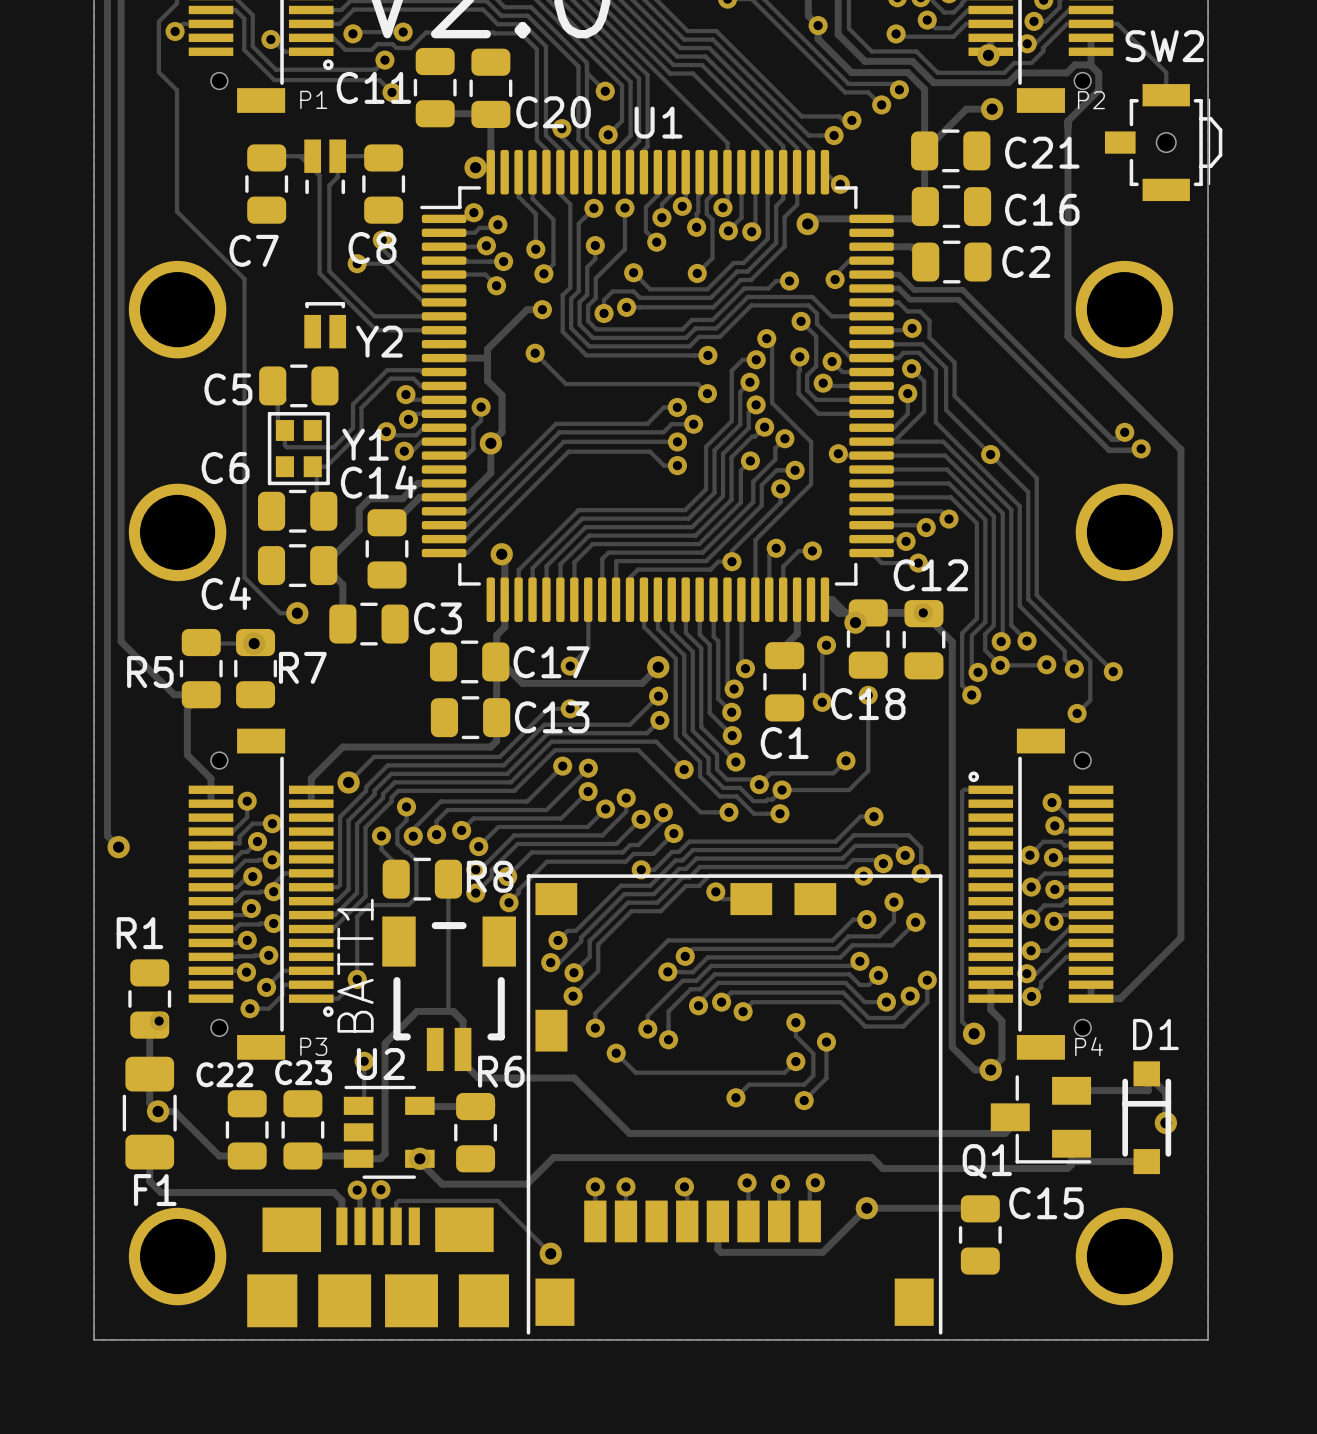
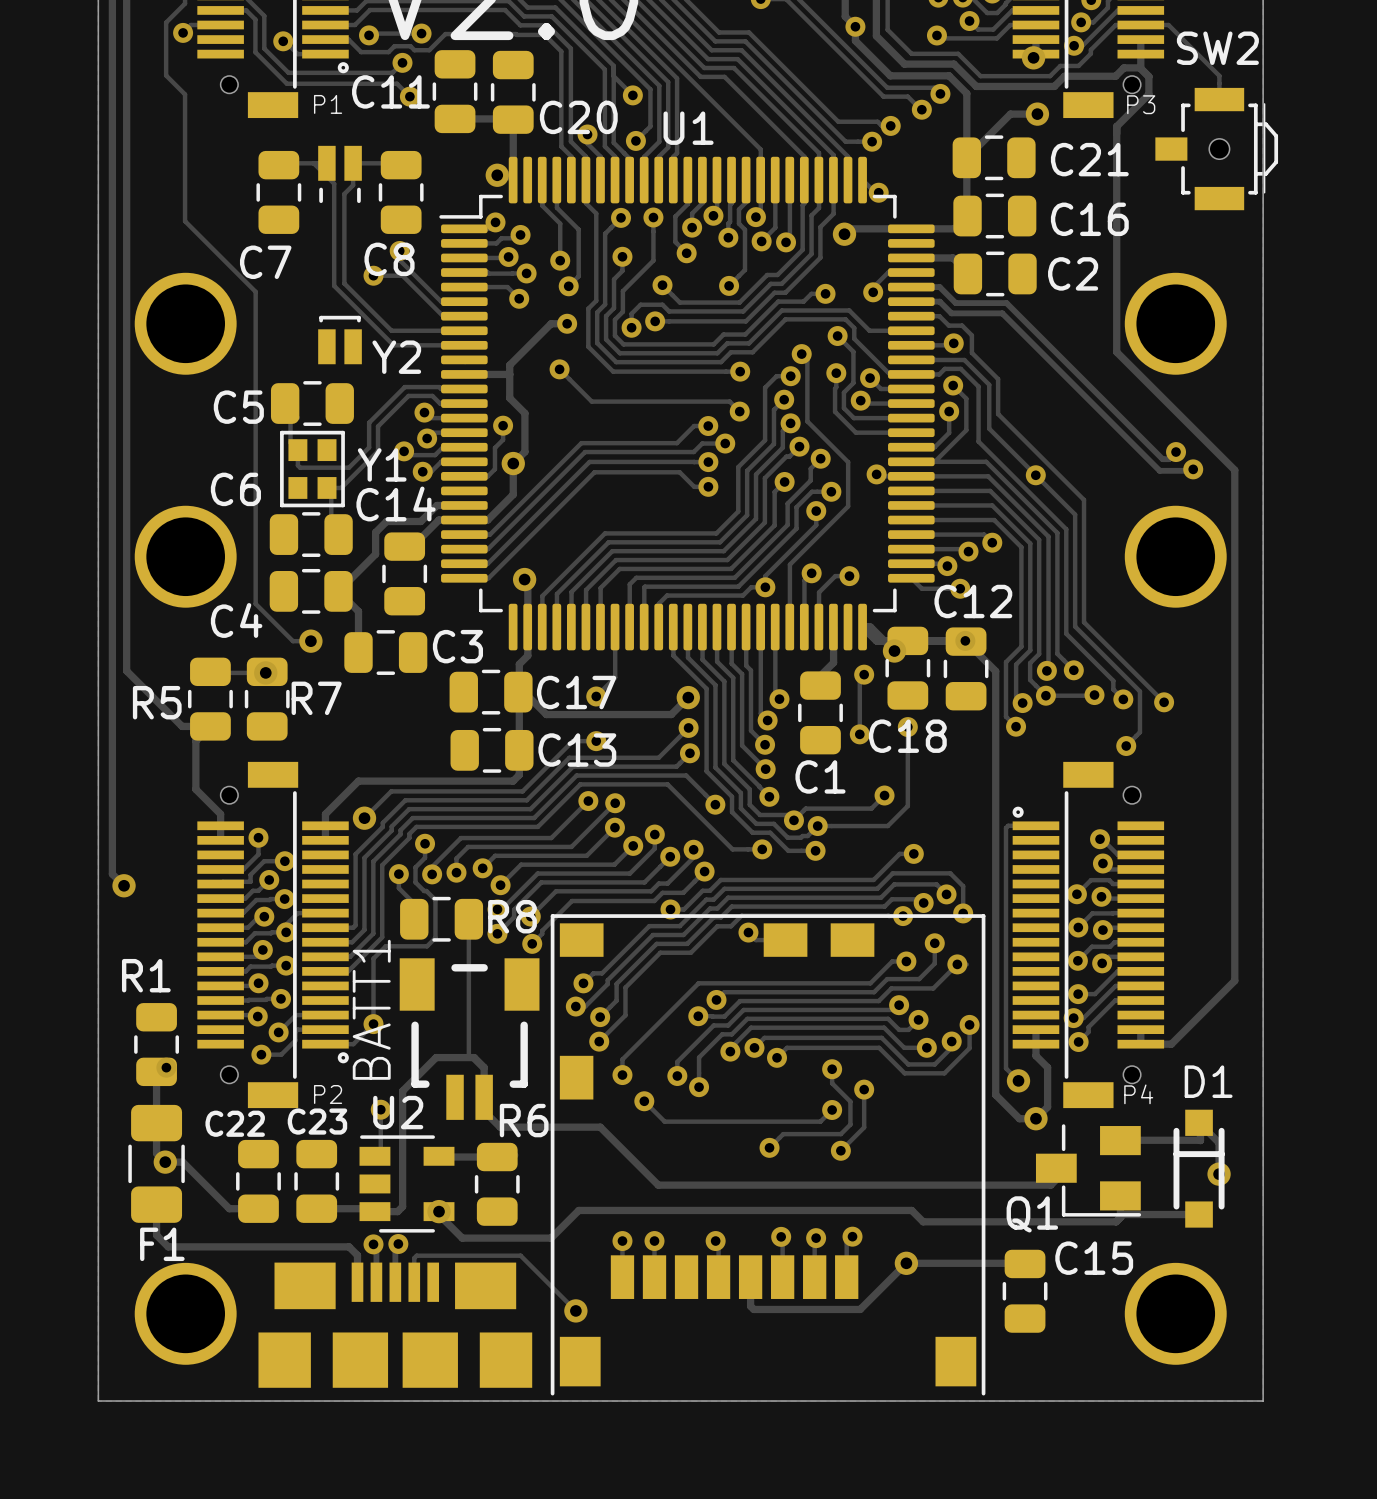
P2 name: P2 (1091, 100) -> P3 (1141, 104)
P3 name: P3 (313, 1046) -> P2 (328, 1094)

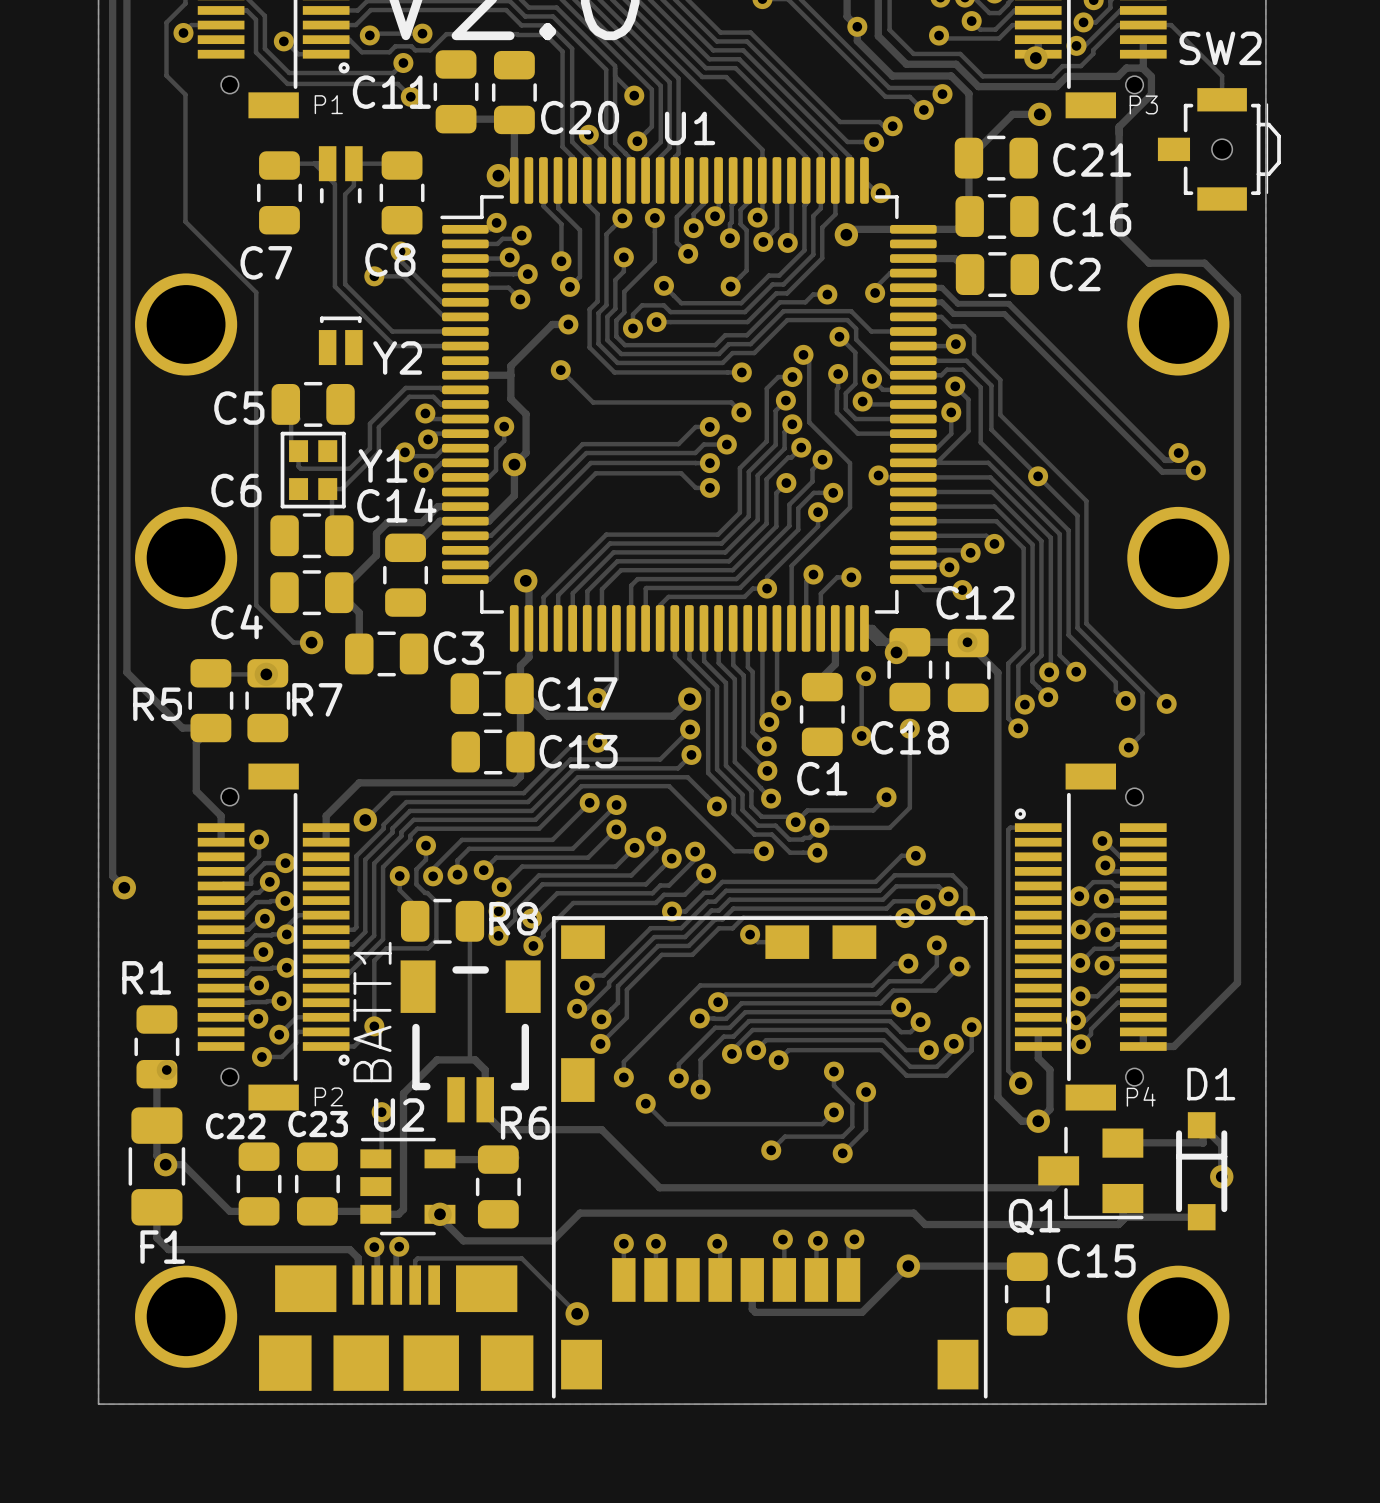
track: (1116, 232) (1116, 352) (1234, 470) -> (1119, 233) (1149, 263) (1204, 263) (1237, 296) (1237, 471)
track: (1094, 695) (1045, 695) -> none
via: (1094, 695) -> none

